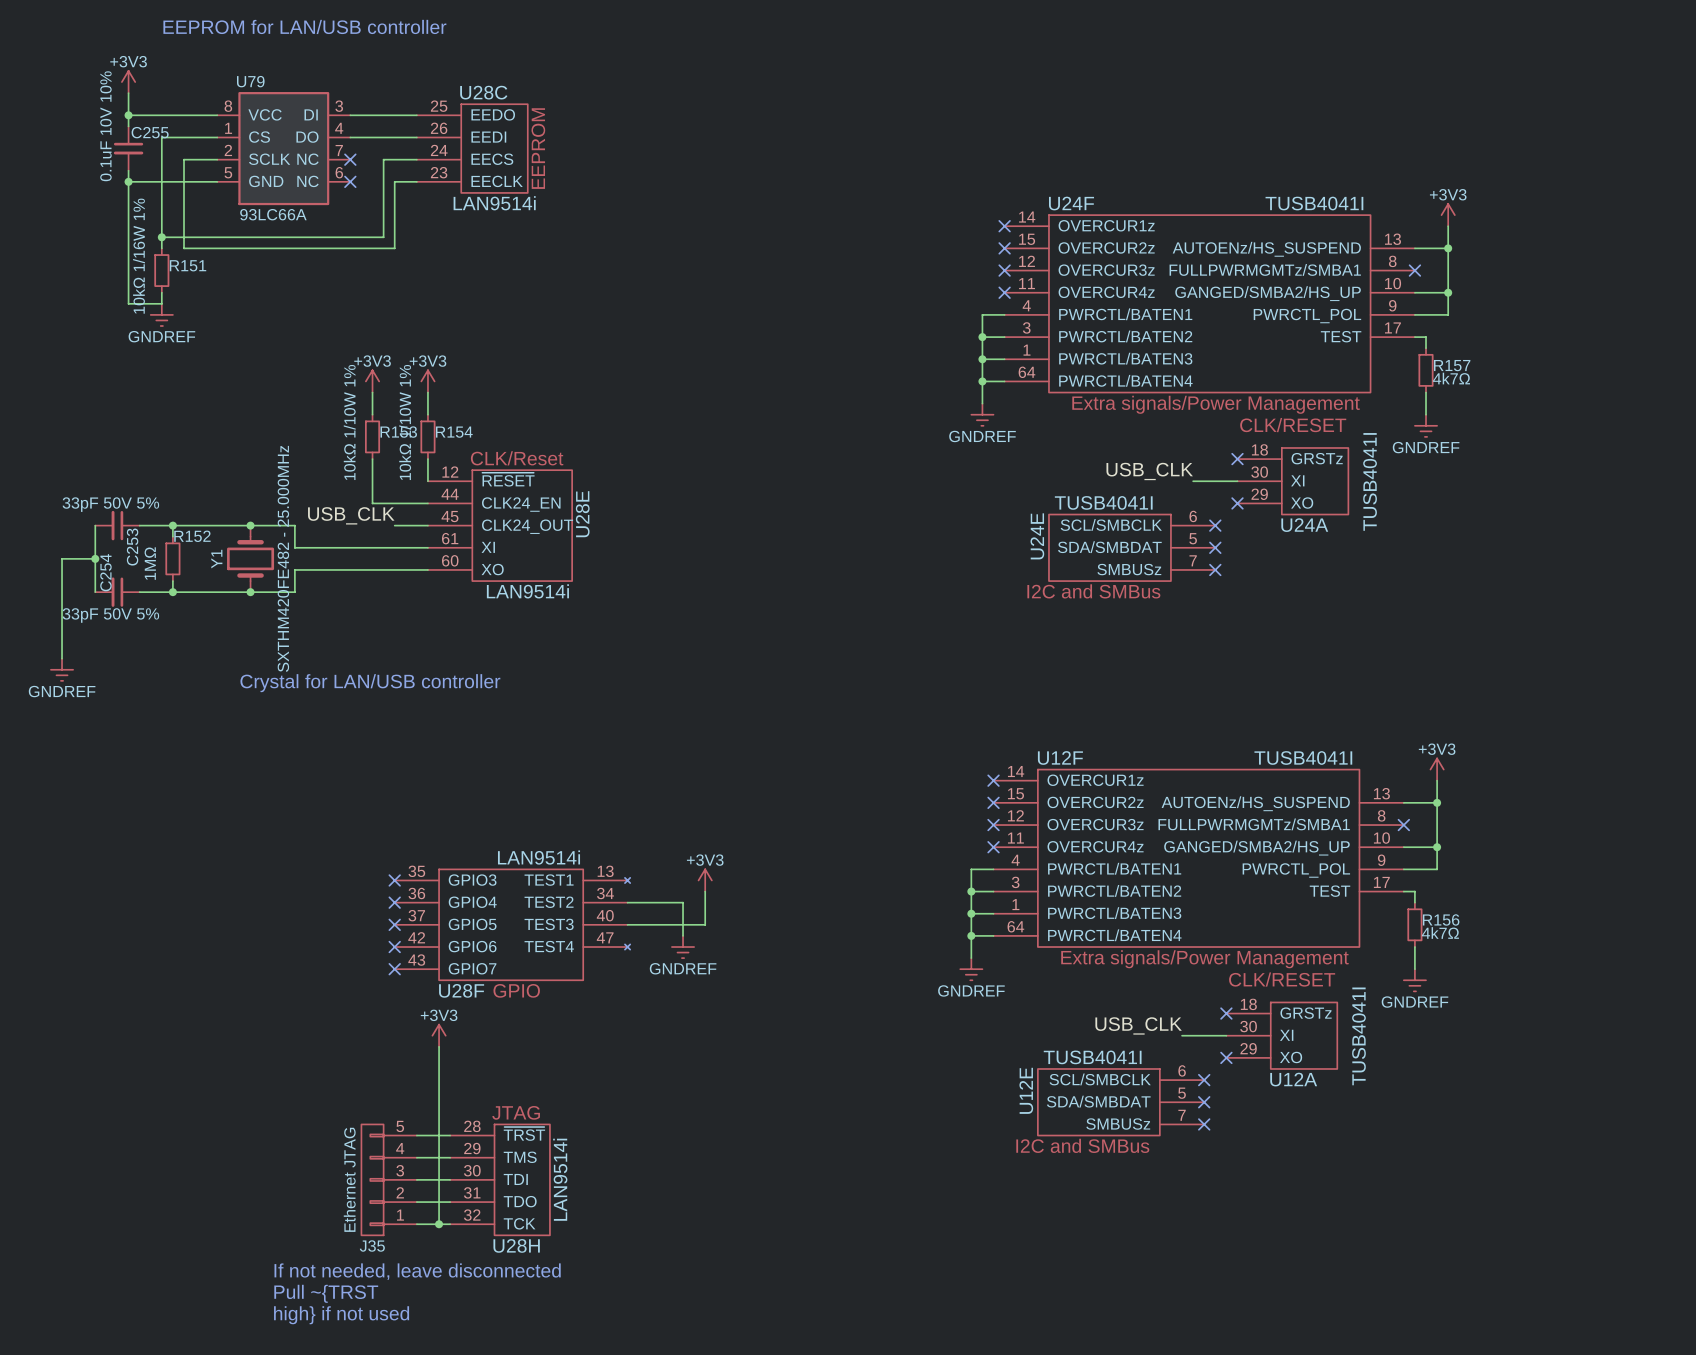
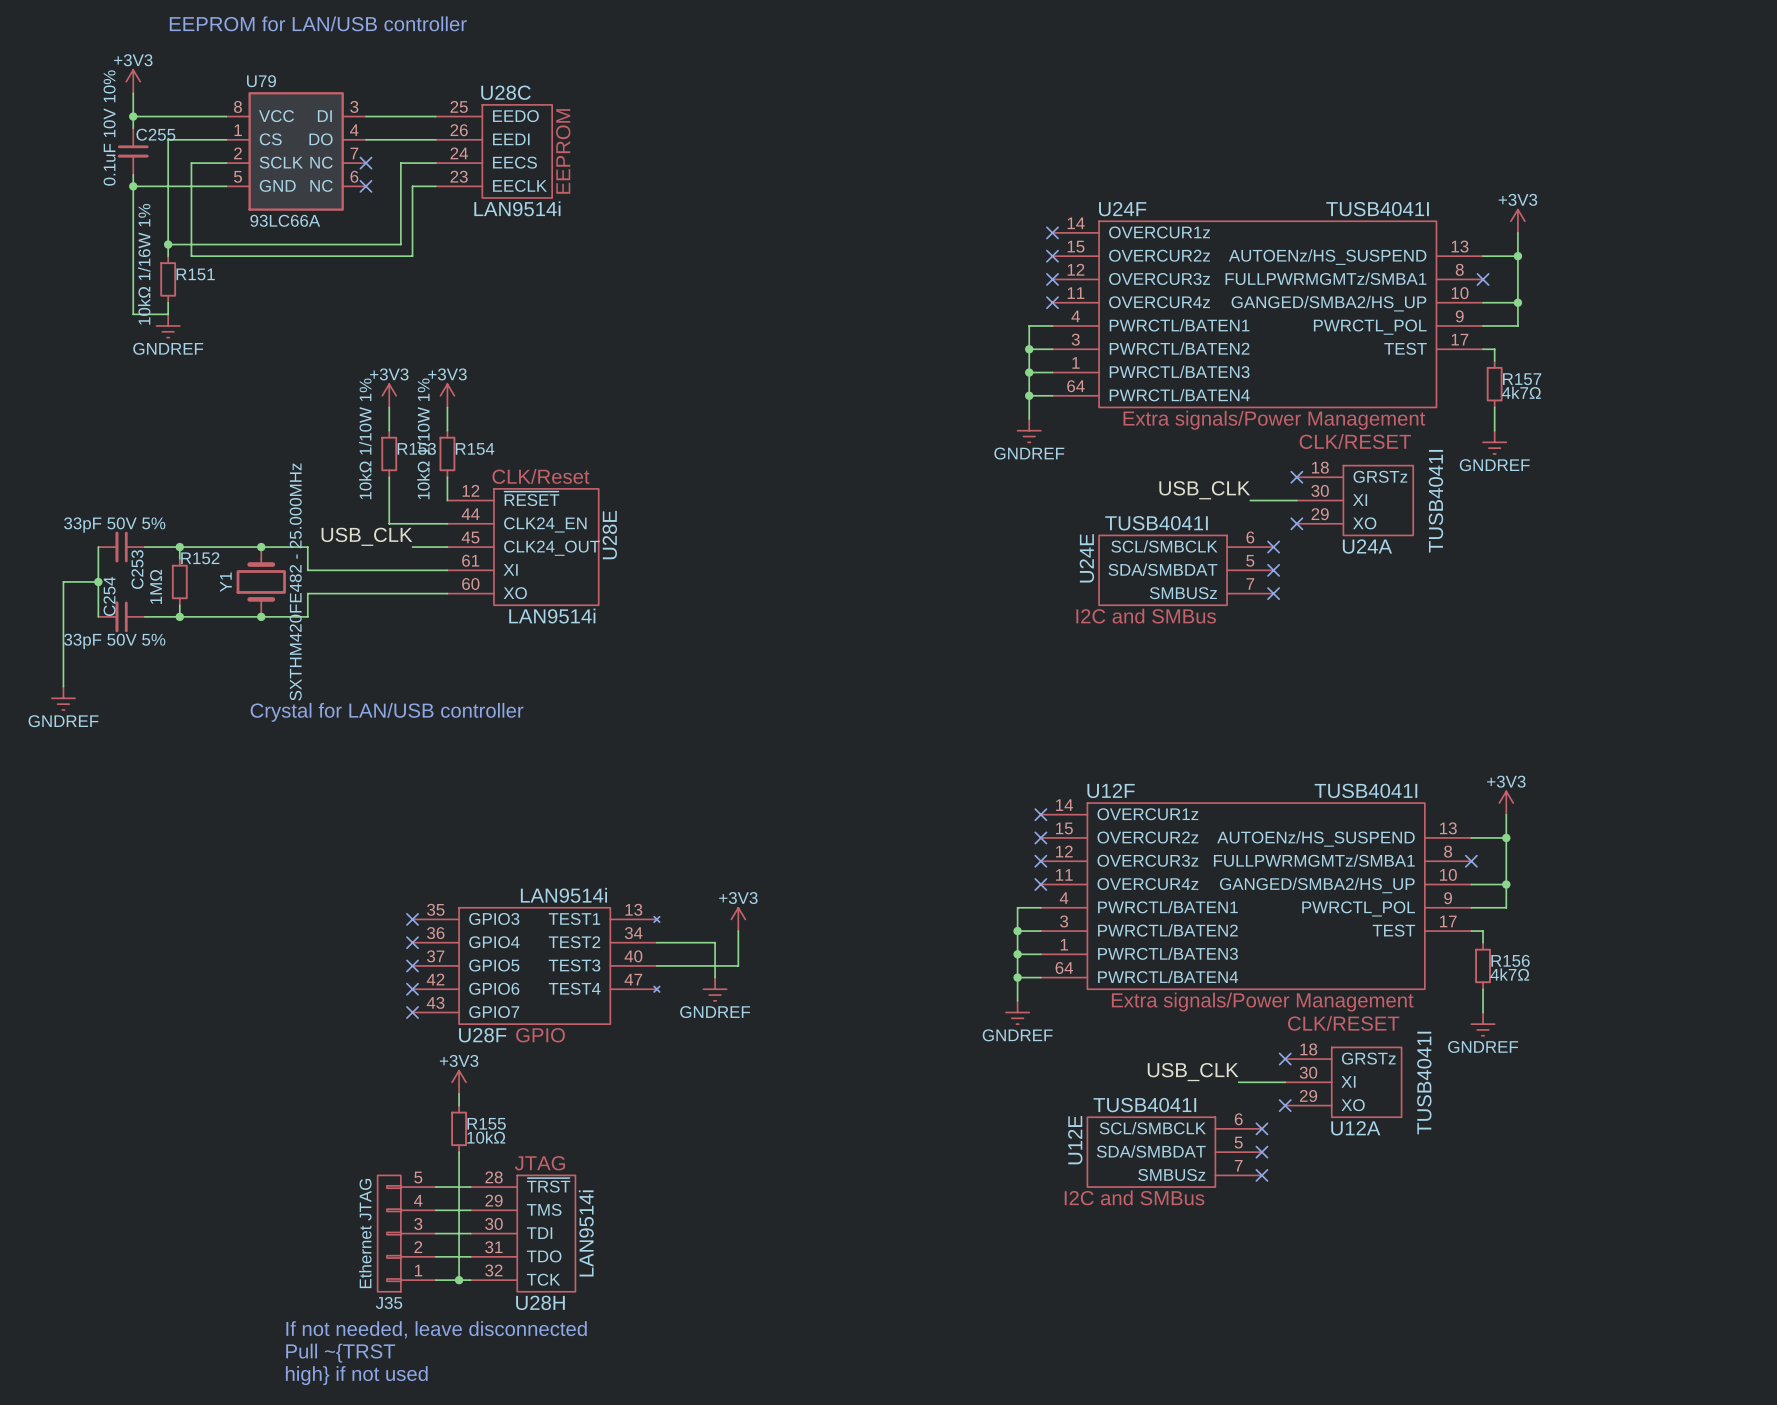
wire: (439, 1057) (439, 1102) -> none
R155: none -> 10kΩ (459, 1128)

